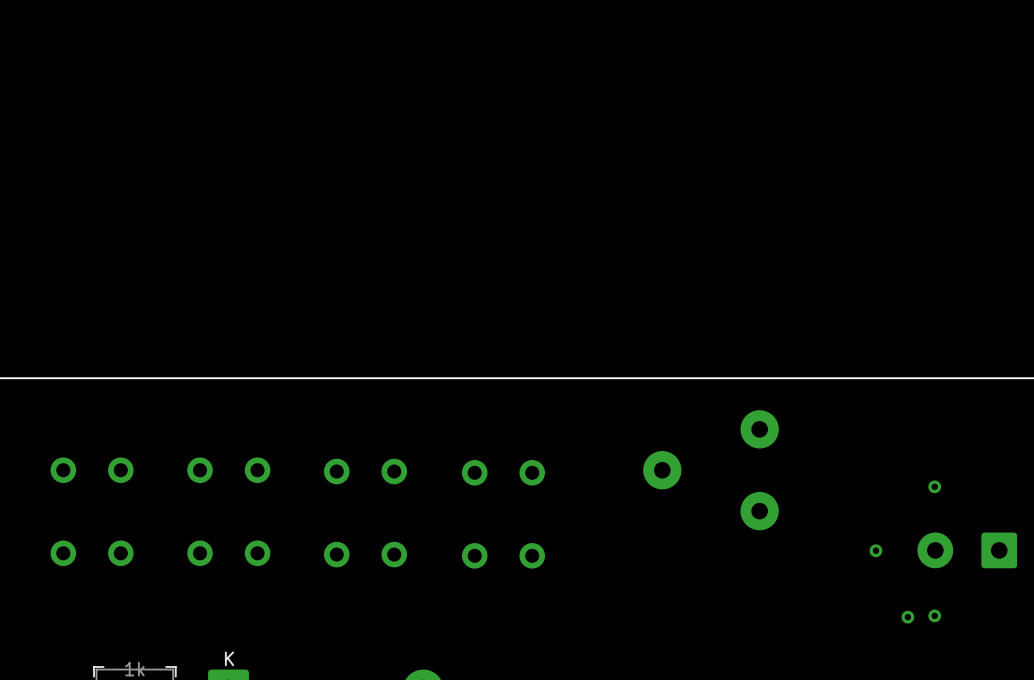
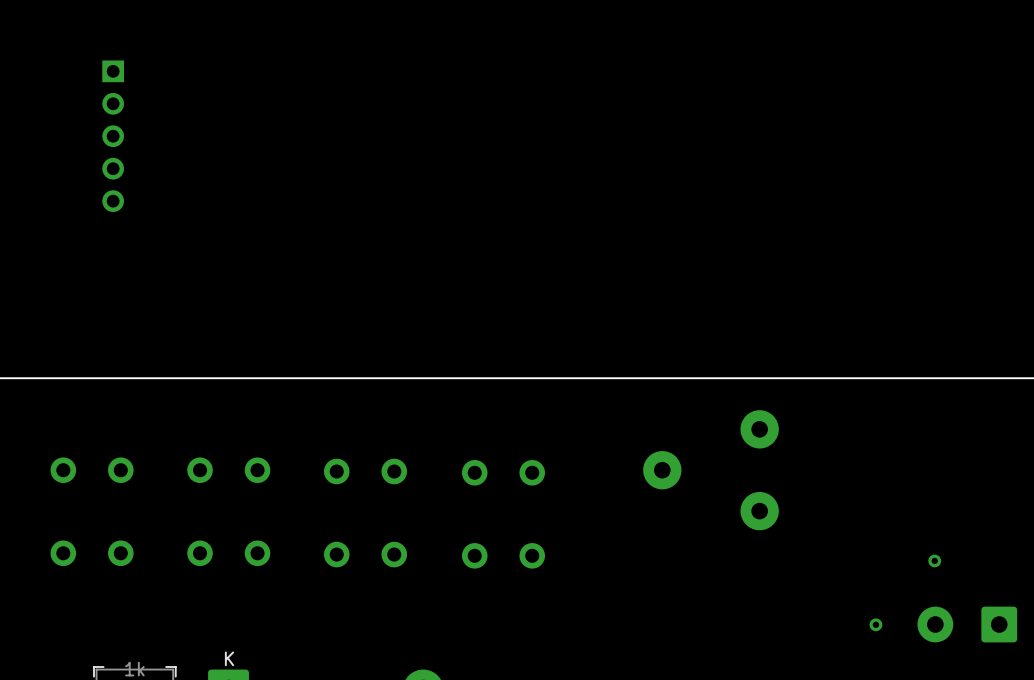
part: none -> (113, 136)
via: (934, 486) -> none
via: (875, 550) -> none
part position: (967, 550) -> (967, 624)
via: none -> (934, 560)
via: (934, 615) -> none
via: (907, 617) -> none
via: none -> (875, 624)

